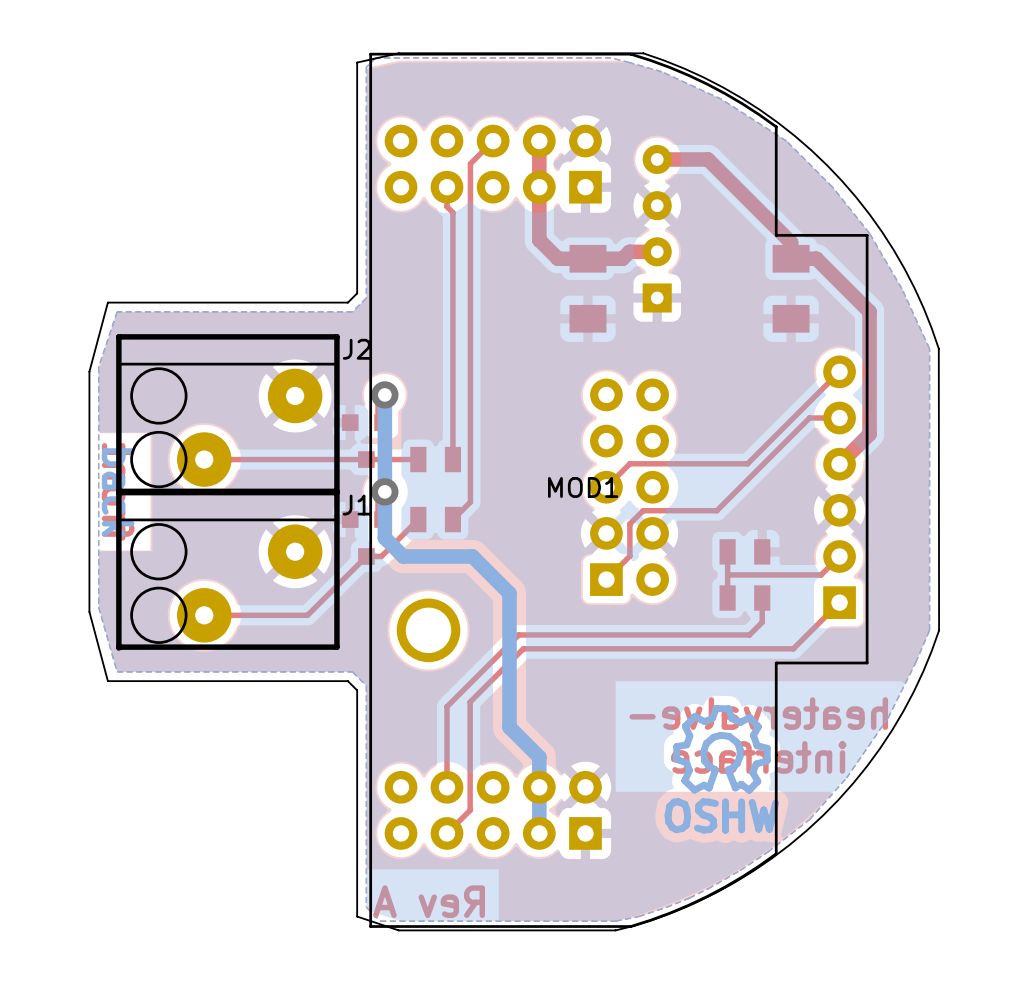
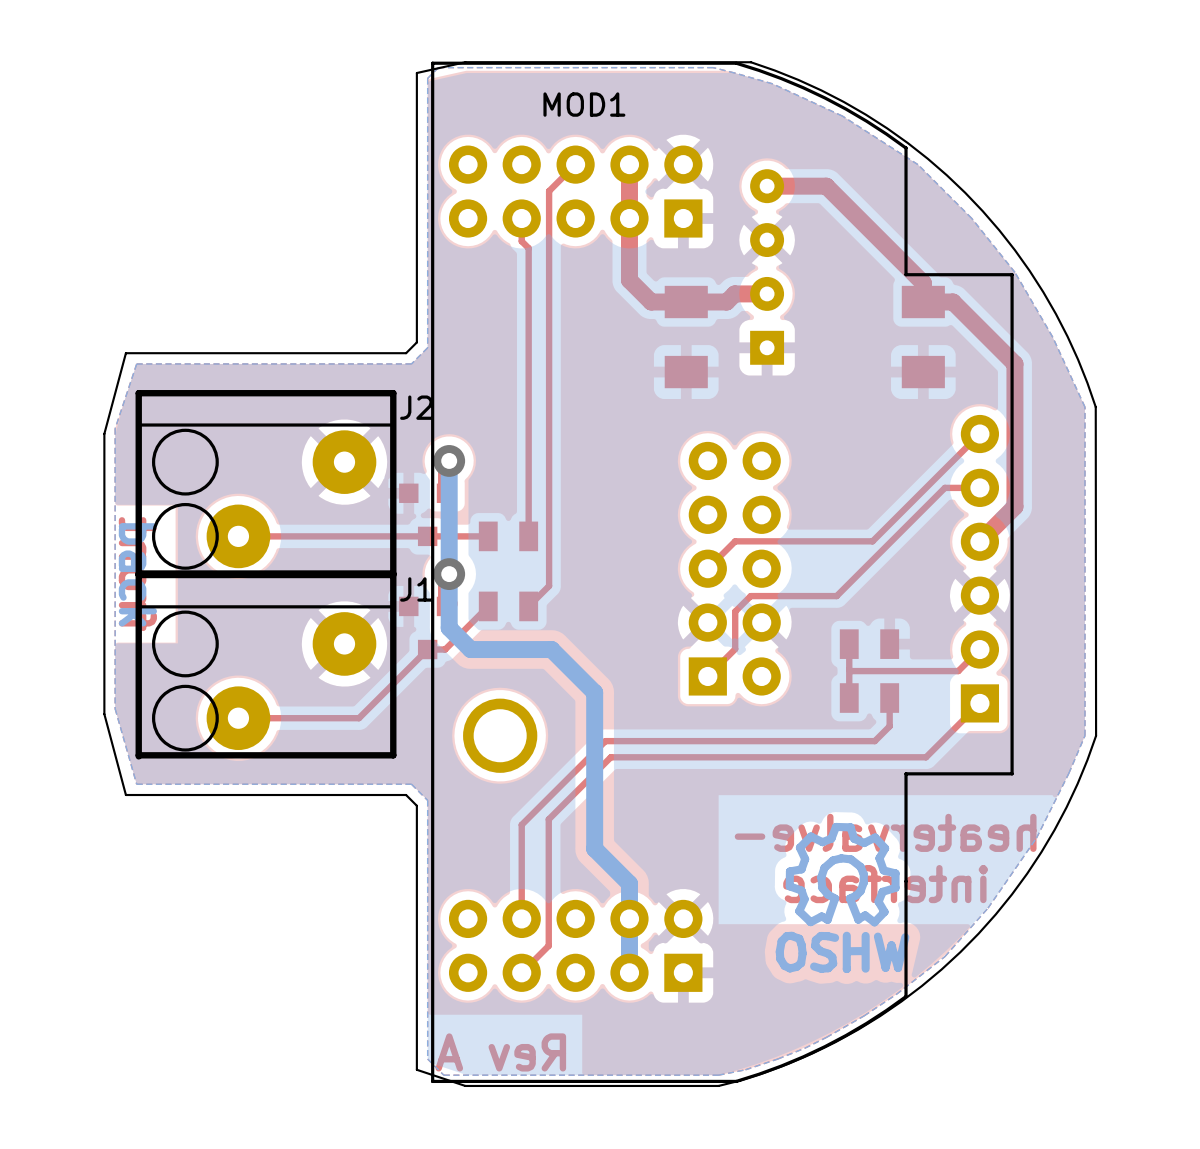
MOD1 name position: MOD1 (583, 487) -> MOD1 (584, 104)

